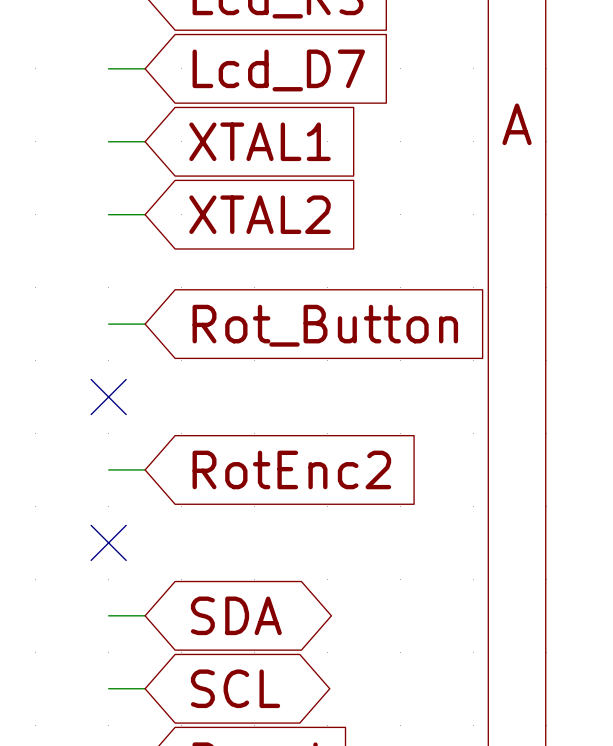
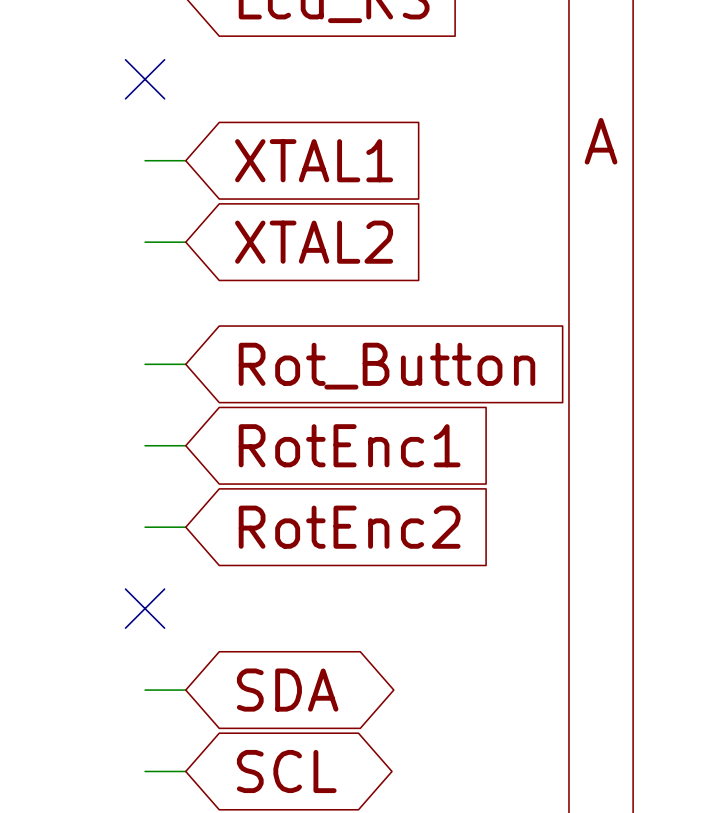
wire: (108, 68) (145, 68) -> (145, 445) (185, 445)
no-connect mark: none -> (145, 79)
global label: Lcd_D7 (278, 70) -> none
no-connect mark: (108, 397) -> none
global label: none -> RotEnc1 (349, 445)

